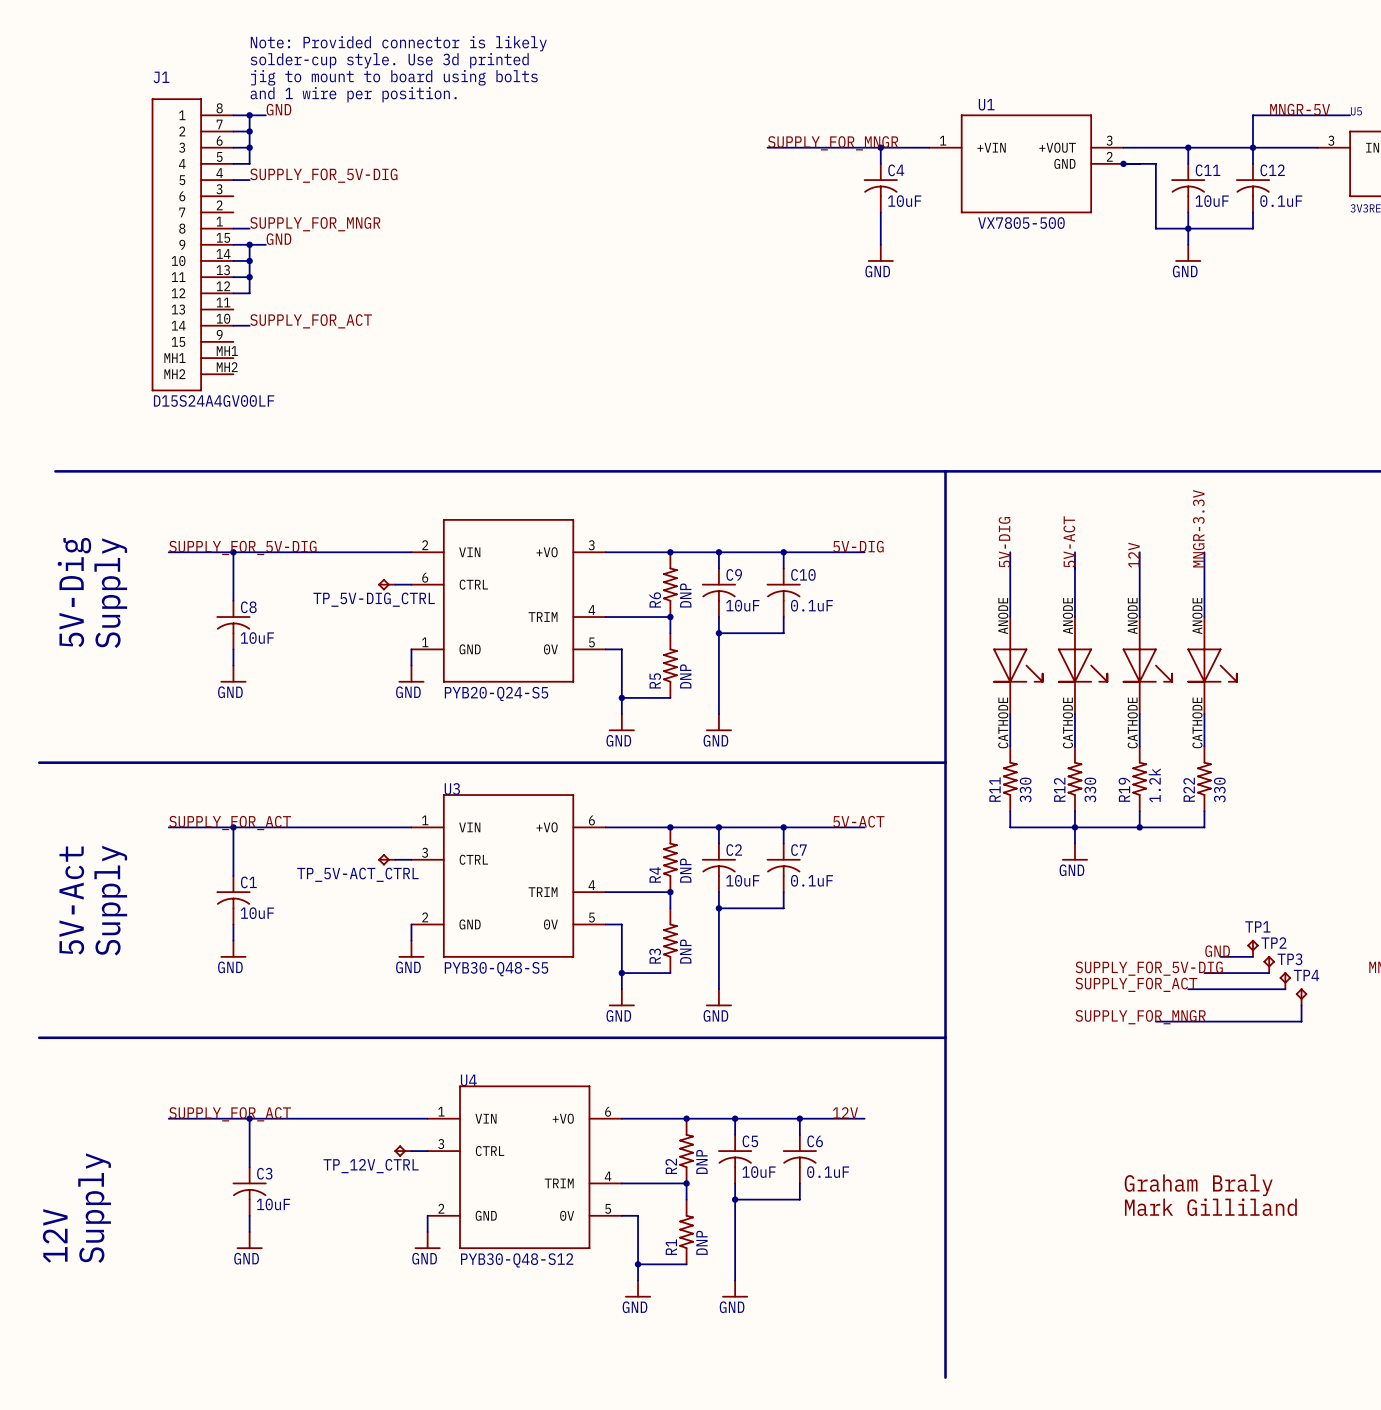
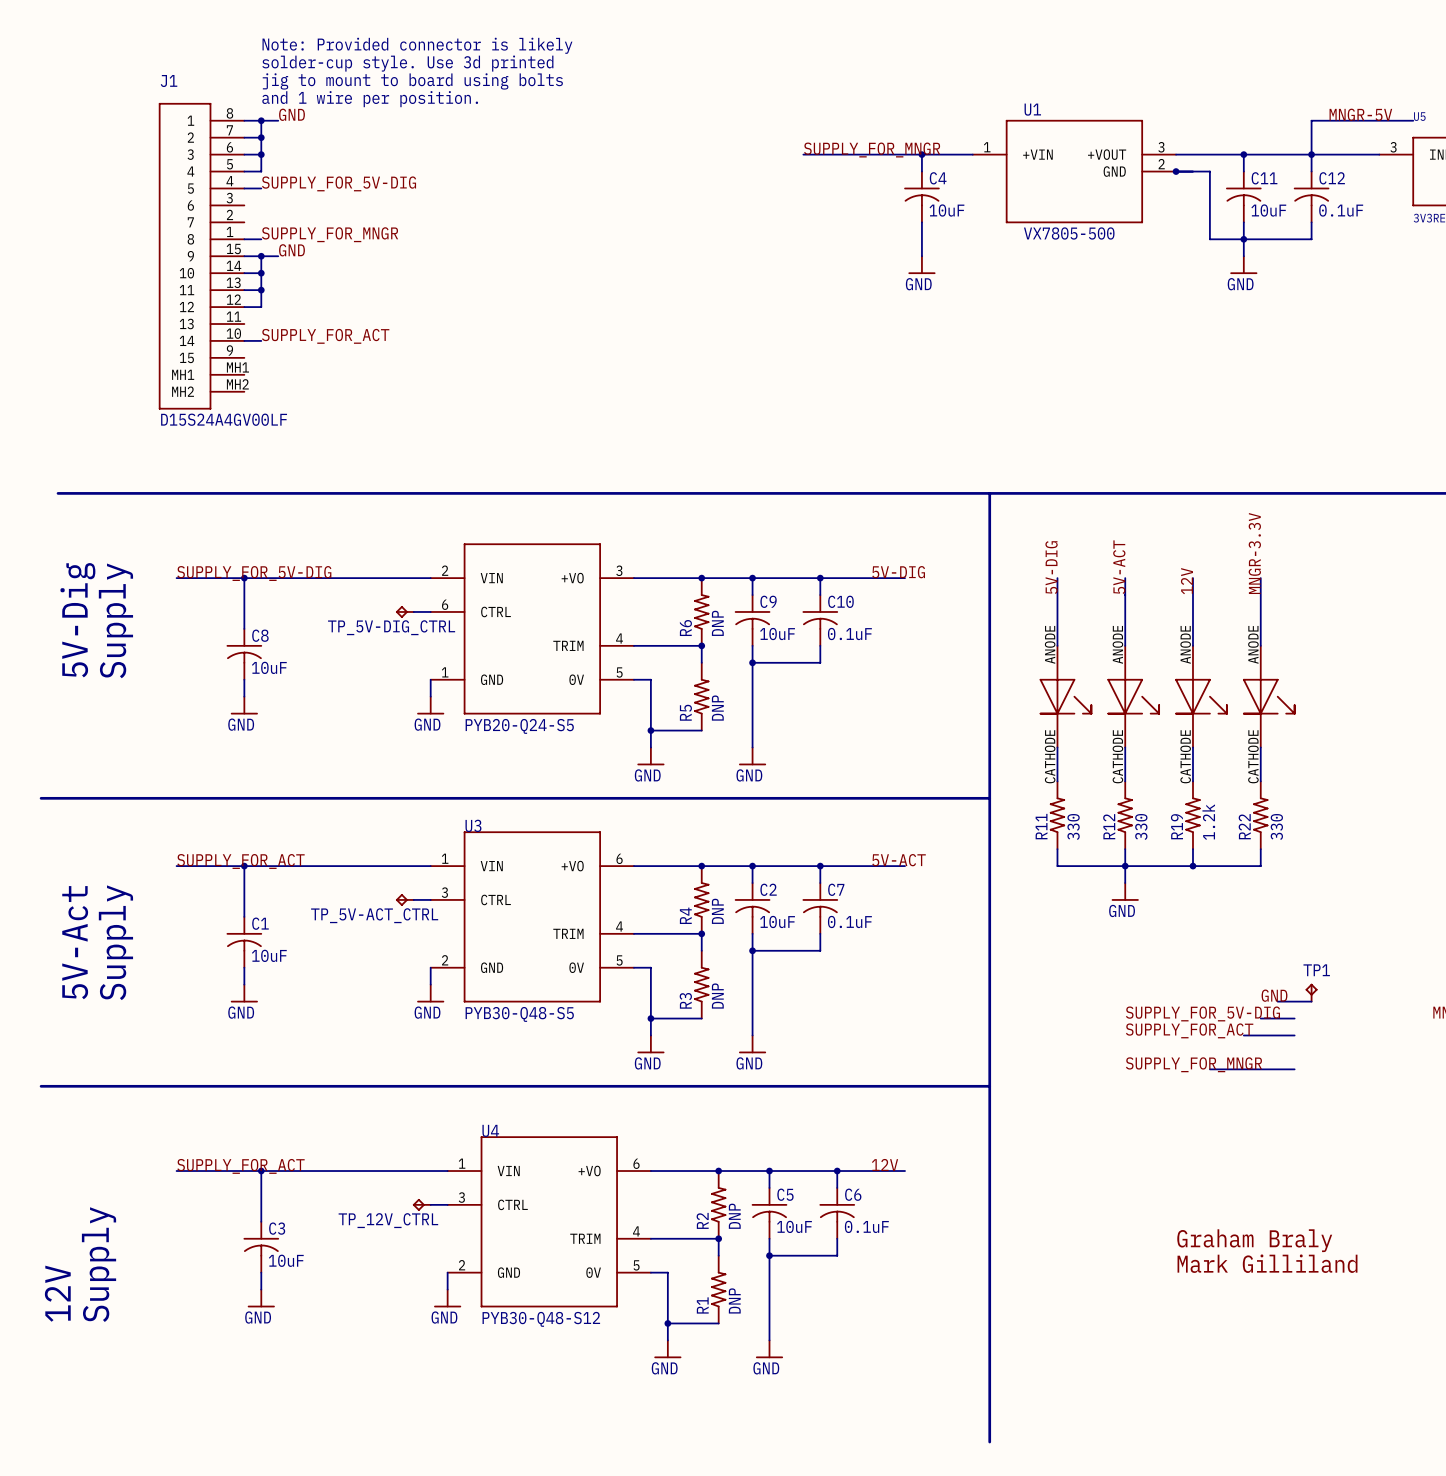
TP2: (1269, 964) -> none
wire: (1236, 973) (1269, 973) -> none
TP3: (1285, 980) -> none
wire: (1236, 989) (1285, 989) -> none
TP4: (1301, 996) -> none
wire: (1301, 1005) (1301, 1021) (1236, 1021) -> none

